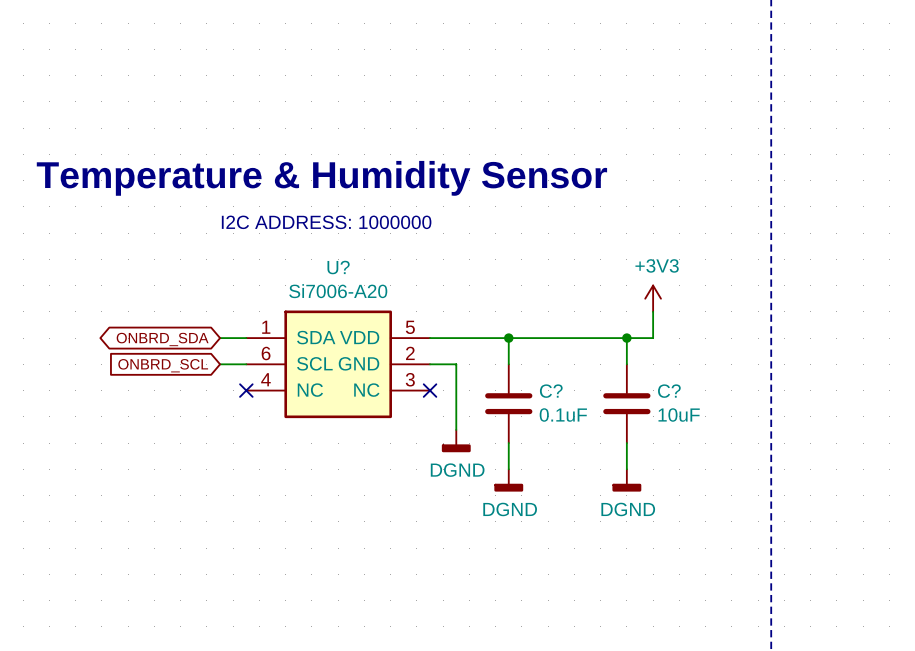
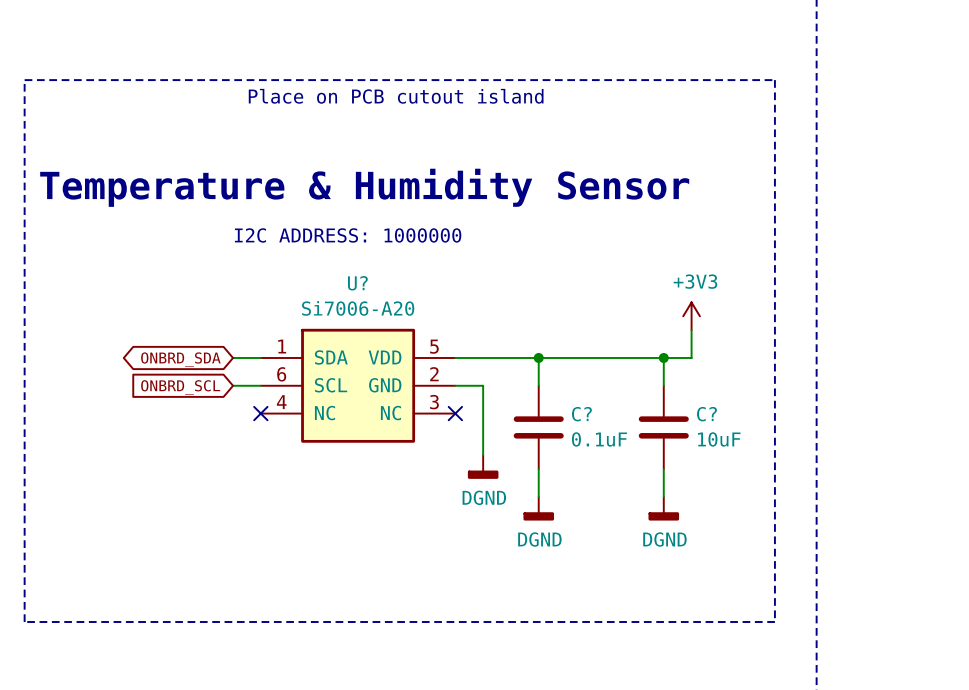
line: none -> (24, 80) (24, 621) (774, 621) (774, 80) (24, 80)
text: none -> Place on PCB cutout island (396, 96)

